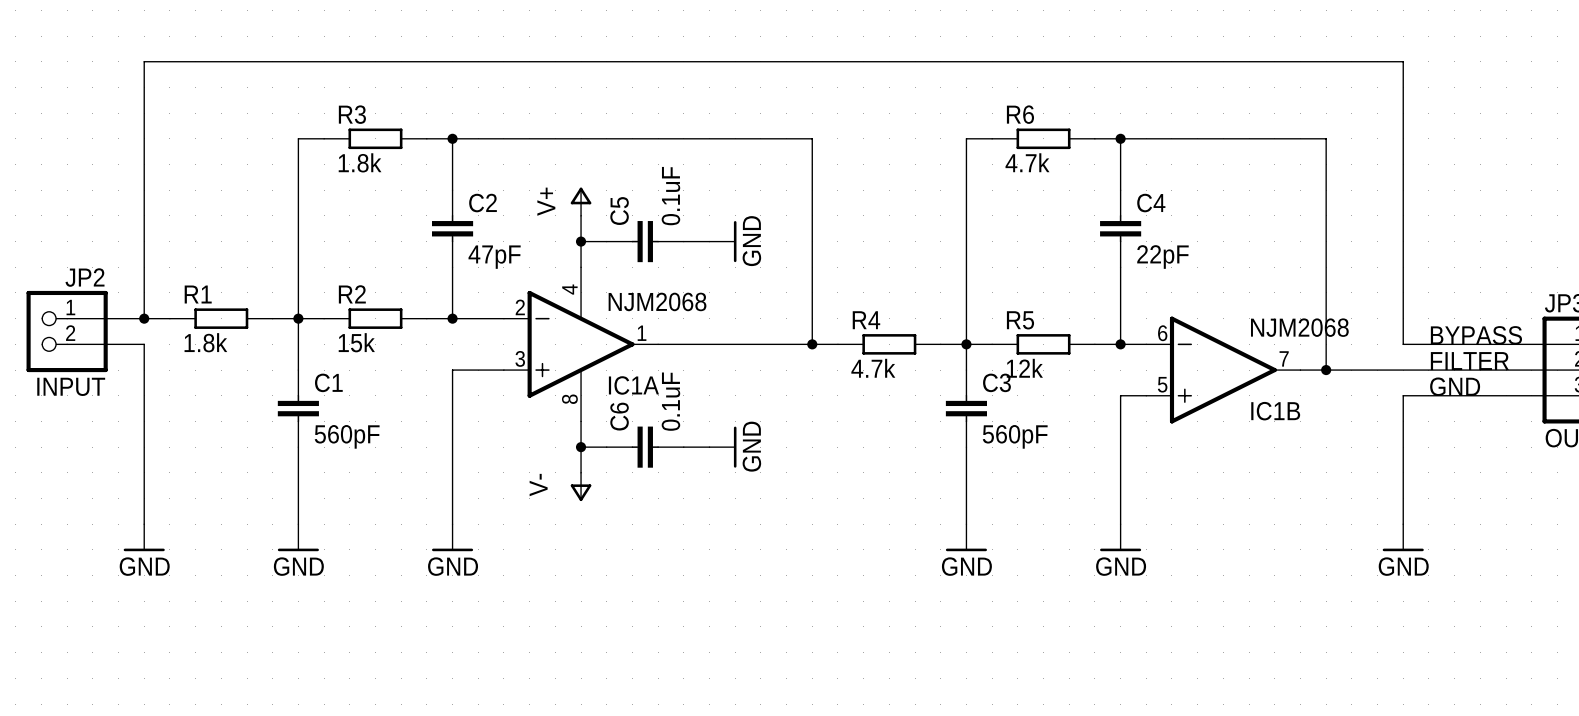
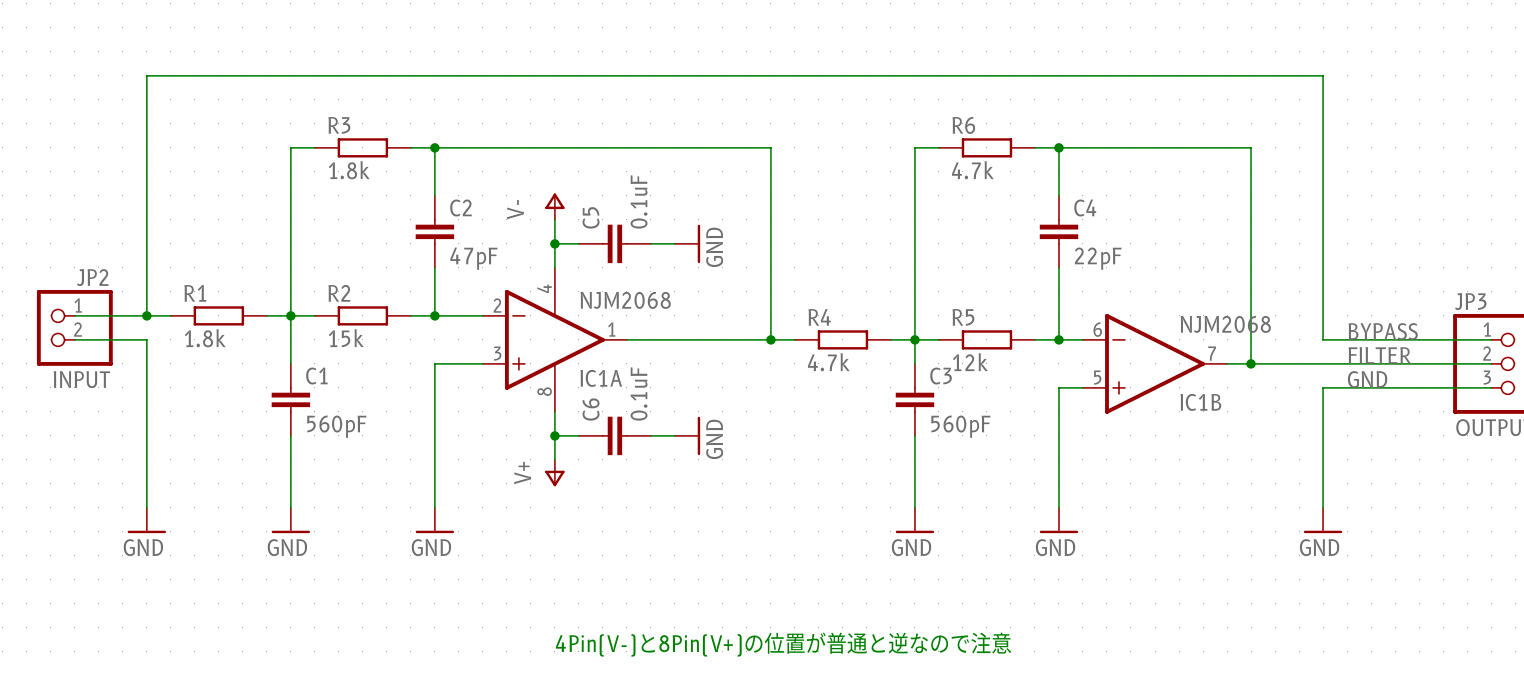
power symbol: V+ (581, 201) -> V- (554, 206)
power symbol: V- (581, 486) -> V+ (554, 473)
text: none -> 4Pin(V-)と8Pin(V+)の位置が普通と逆なので注意 (783, 644)

